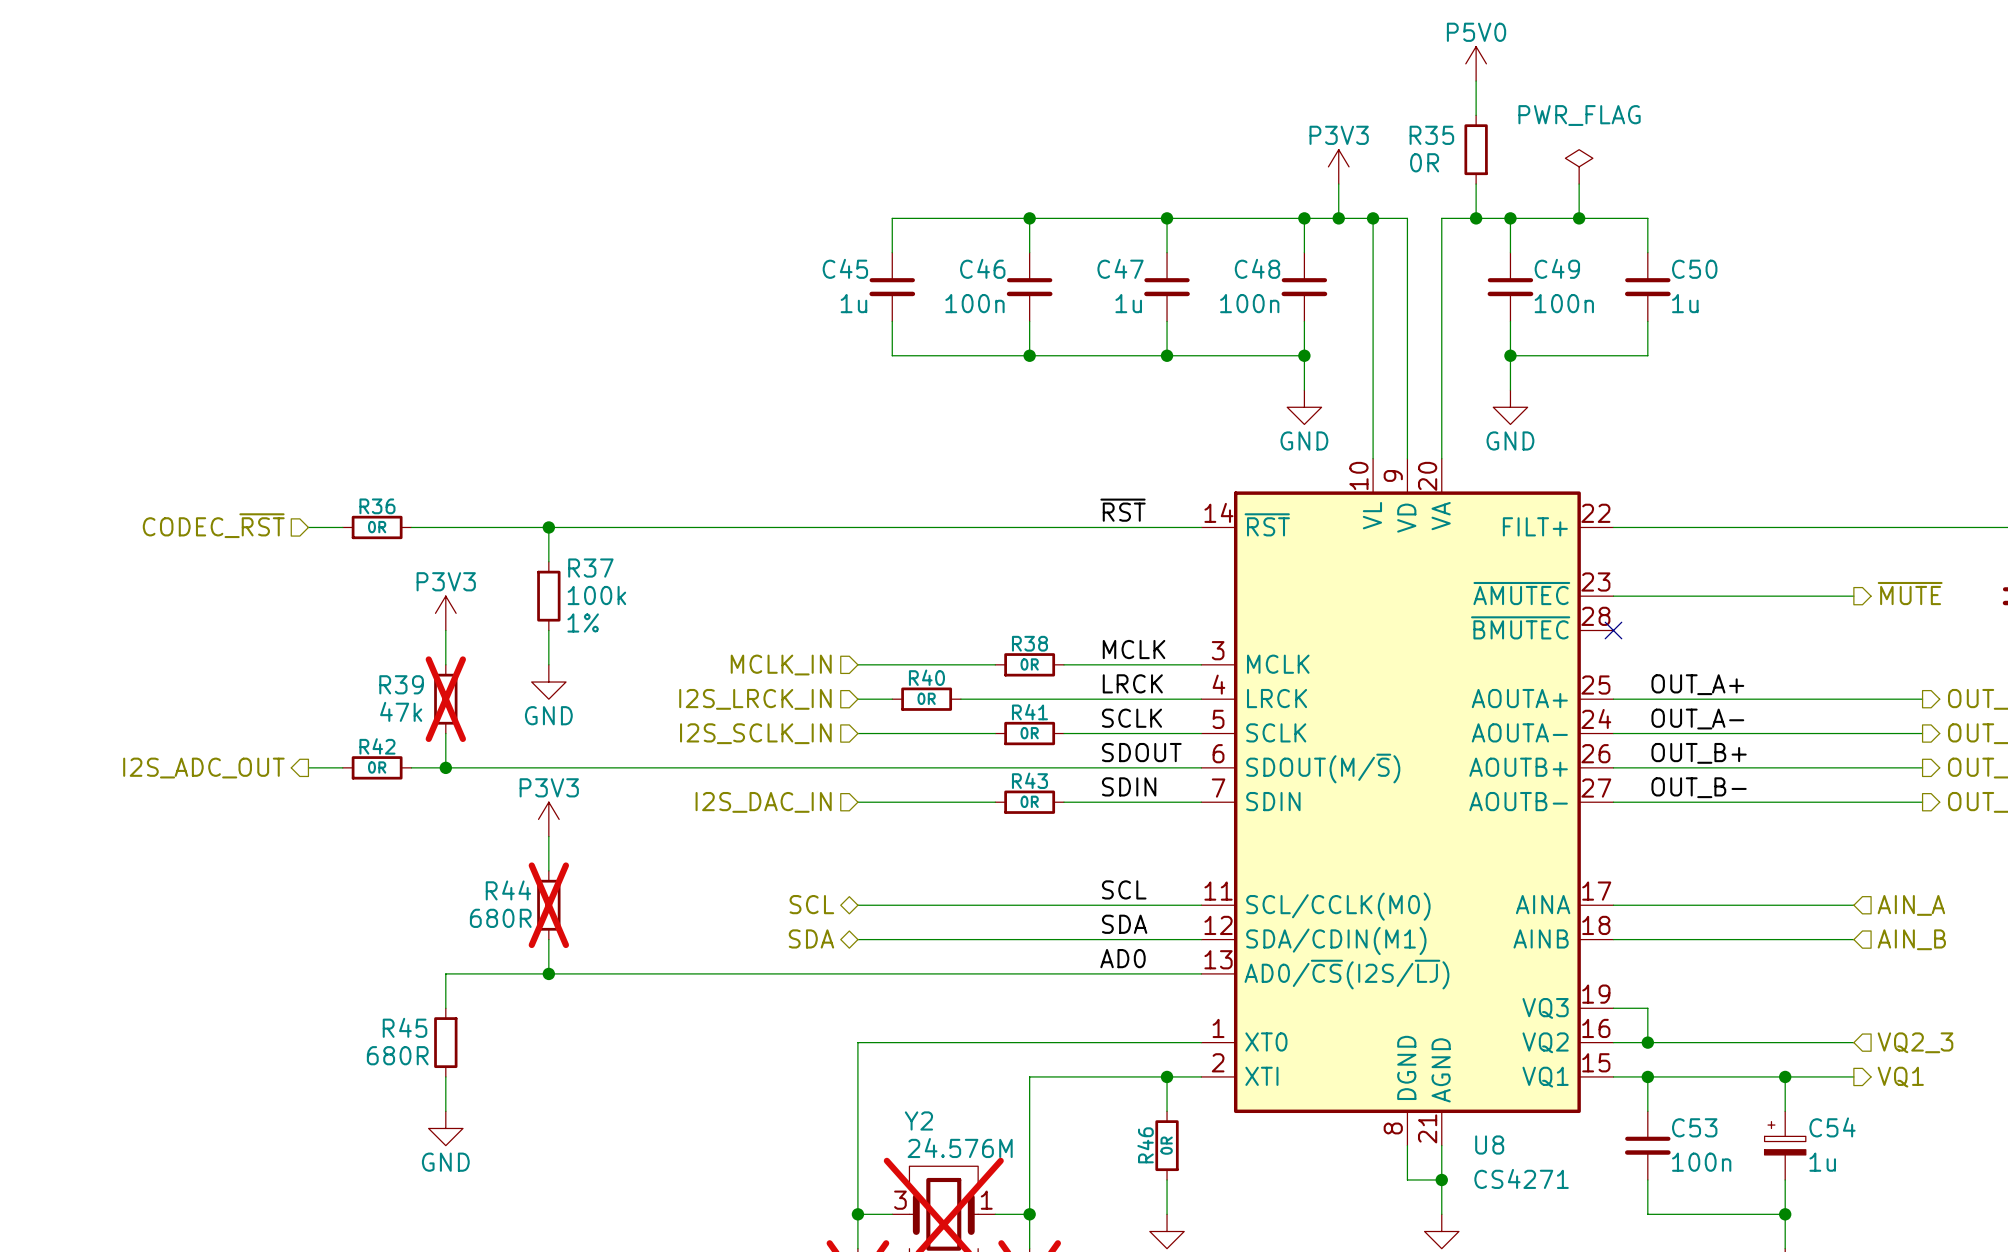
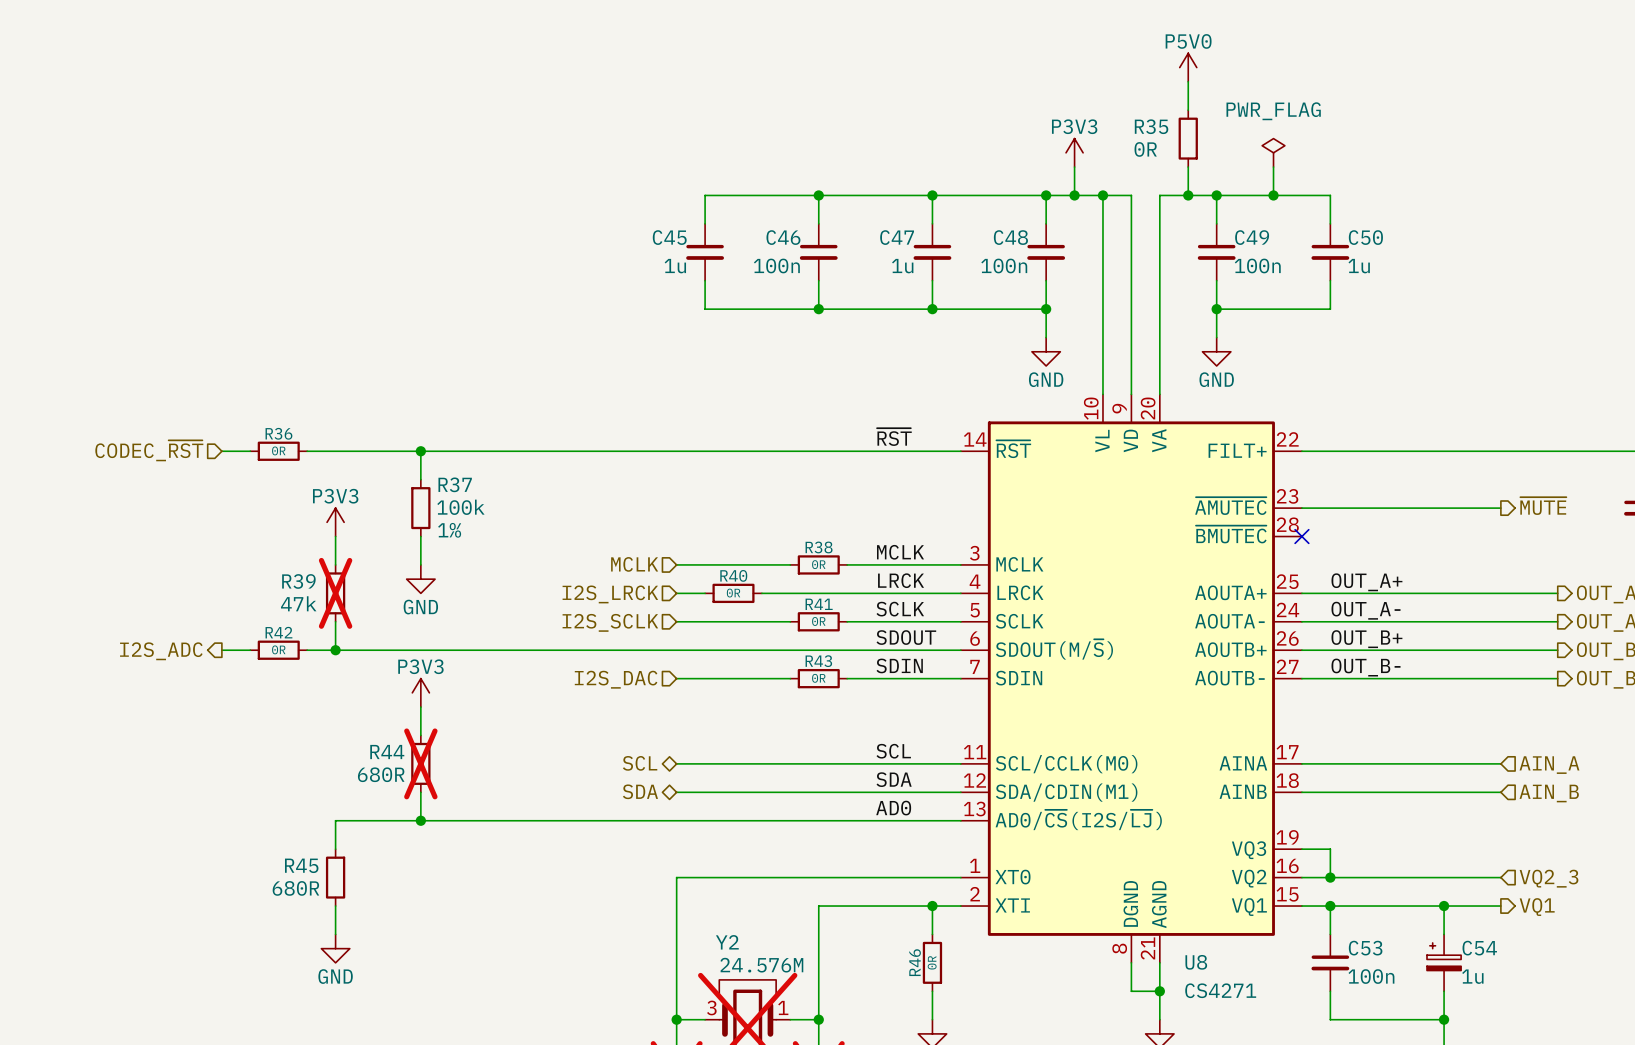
hierarchical label: MCLK_IN (781, 665) -> MCLK (634, 564)
hierarchical label: I2S_LRCK_IN (755, 699) -> I2S_LRCK (610, 594)
hierarchical label: I2S_SCLK_IN (755, 733) -> I2S_SCLK (610, 622)
hierarchical label: I2S_ADC_OUT (203, 768) -> I2S_ADC (161, 651)
hierarchical label: I2S_DAC_IN (763, 802) -> I2S_DAC (616, 679)

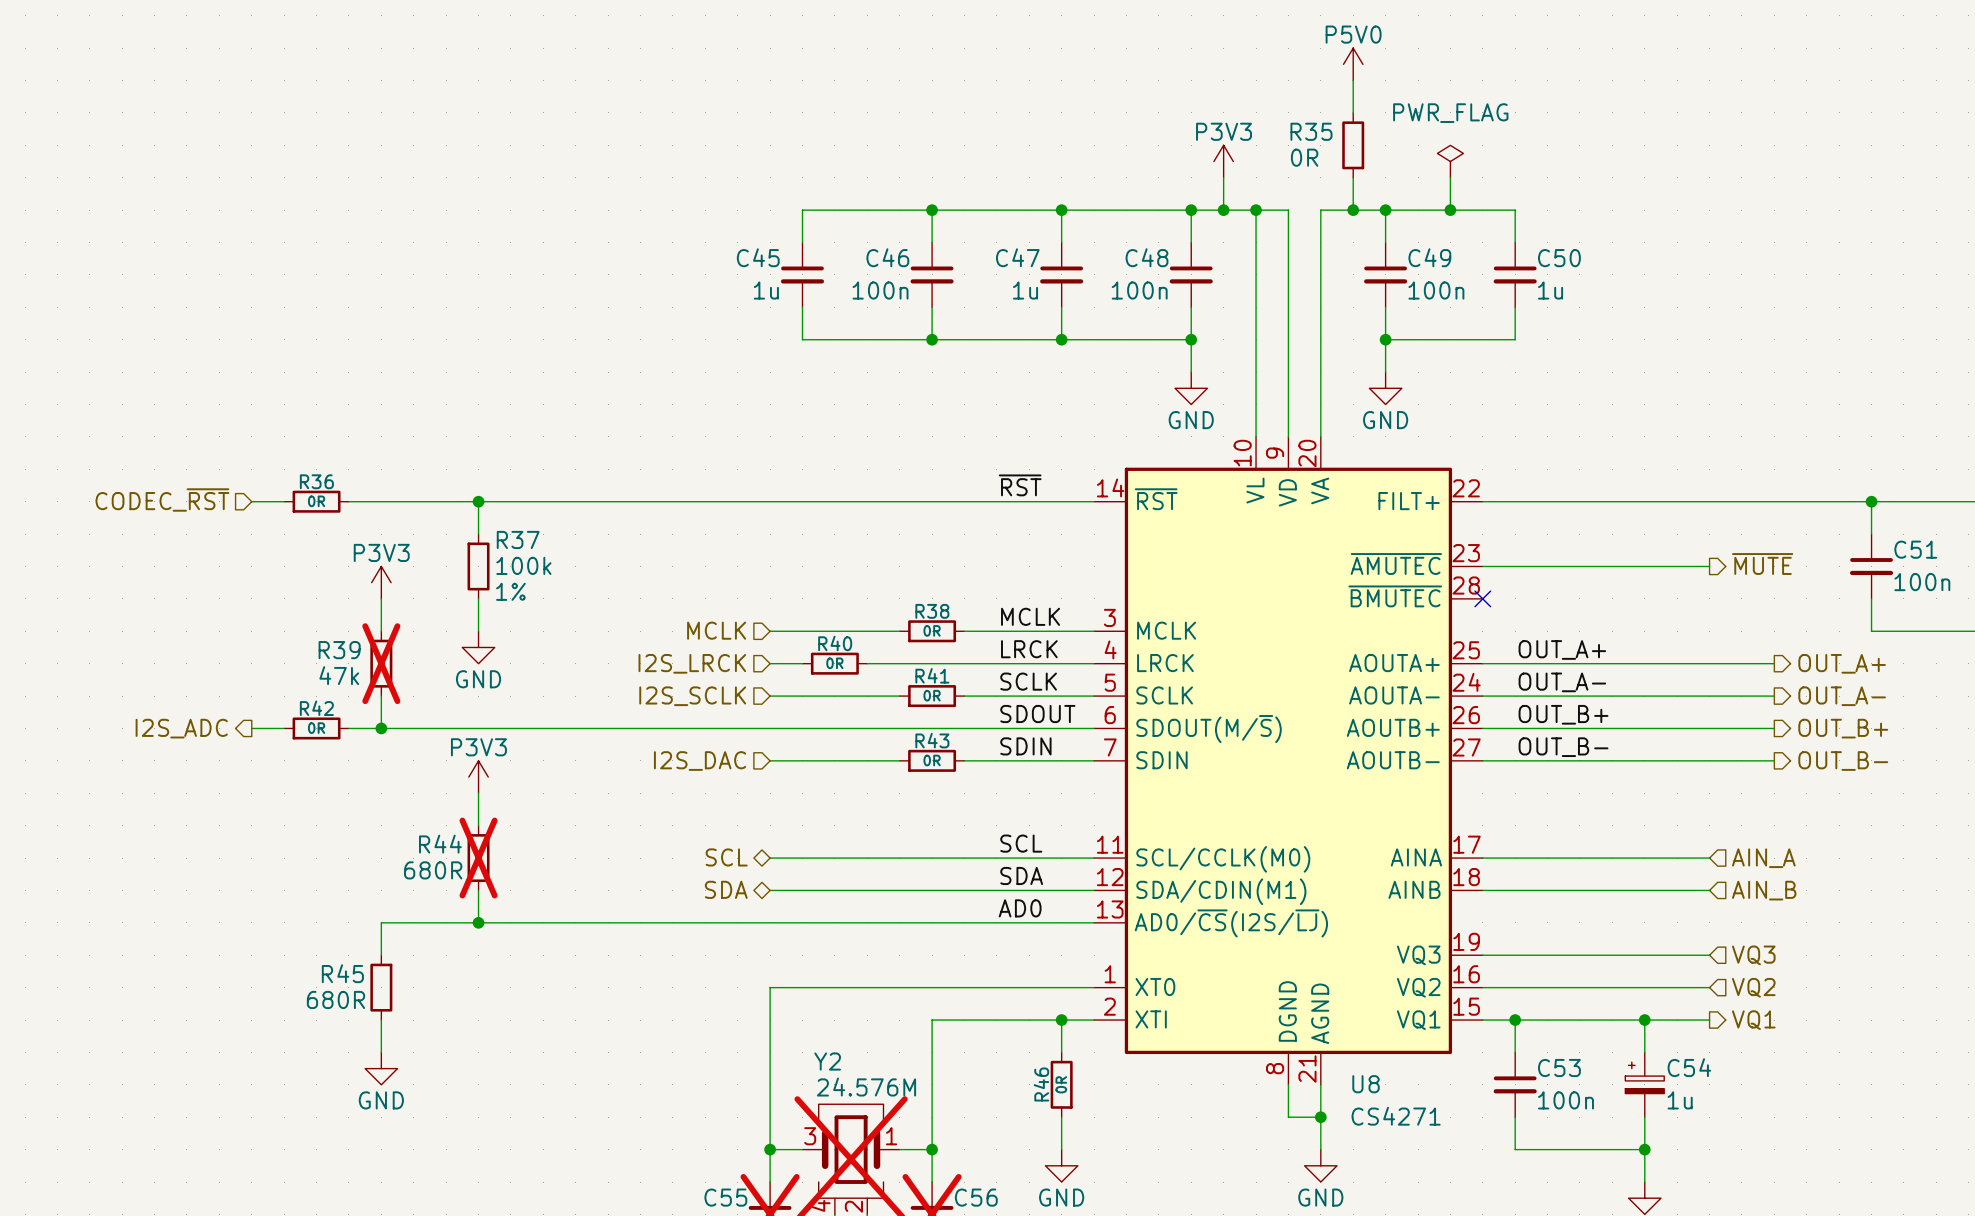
wire: (1330, 849) (1330, 877) -> (1515, 955) (1709, 955)
hierarchical label: none -> VQ3 (1753, 955)
junction: (1330, 877) -> none
hierarchical label: VQ2_3 (1549, 878) -> VQ2 (1753, 987)

